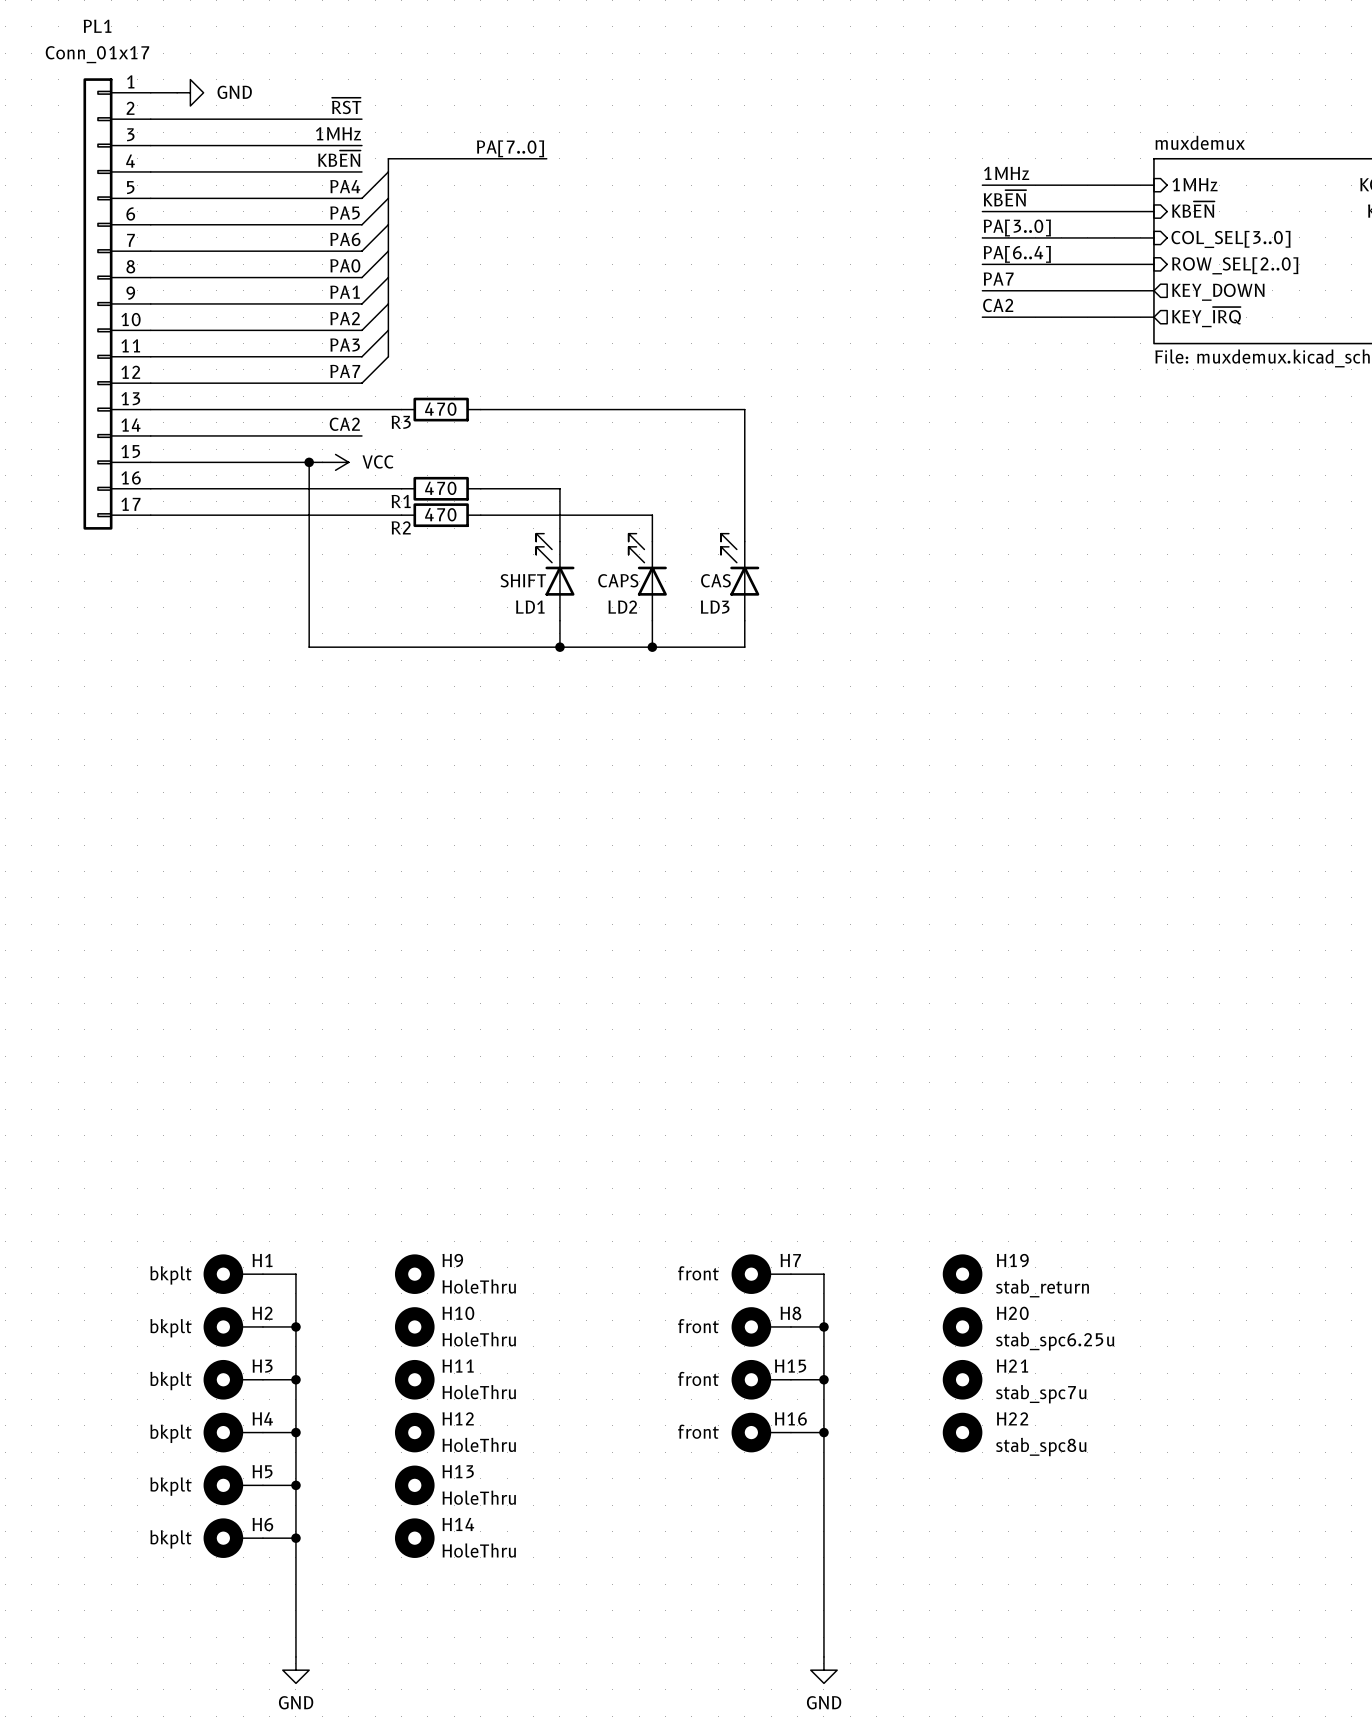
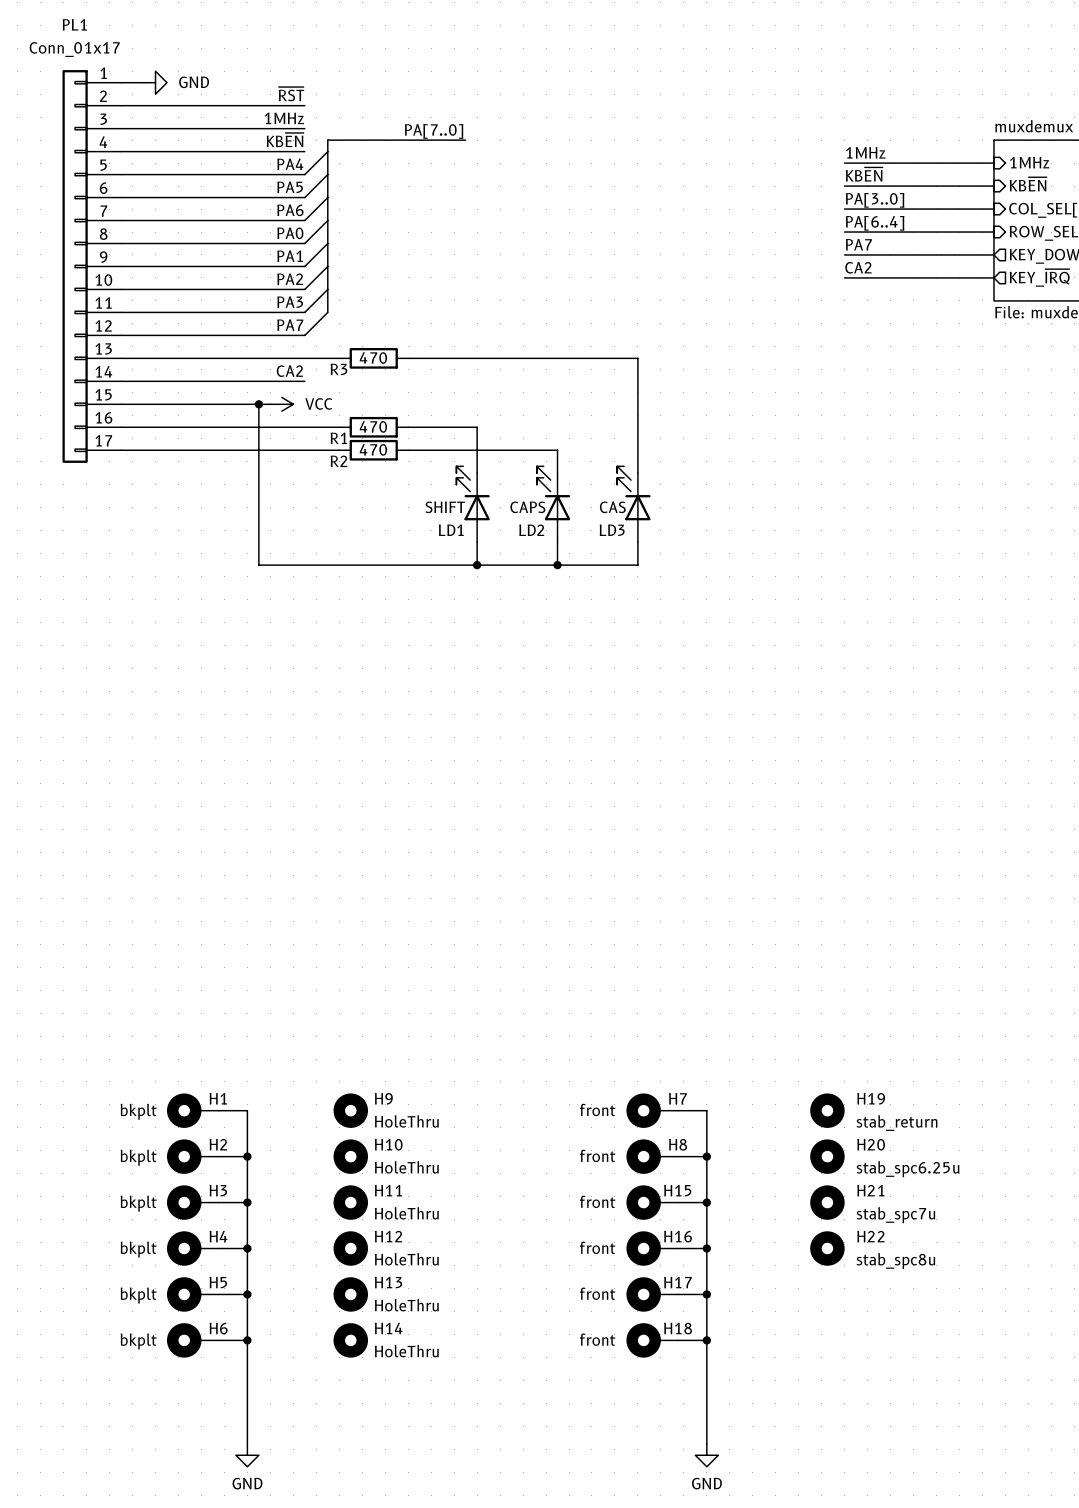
H17: none -> front (652, 1294)
wire: none -> (678, 1294) (706, 1294)
junction: none -> (706, 1294)
H18: none -> front (652, 1340)
wire: none -> (678, 1340) (706, 1340)
junction: none -> (706, 1340)

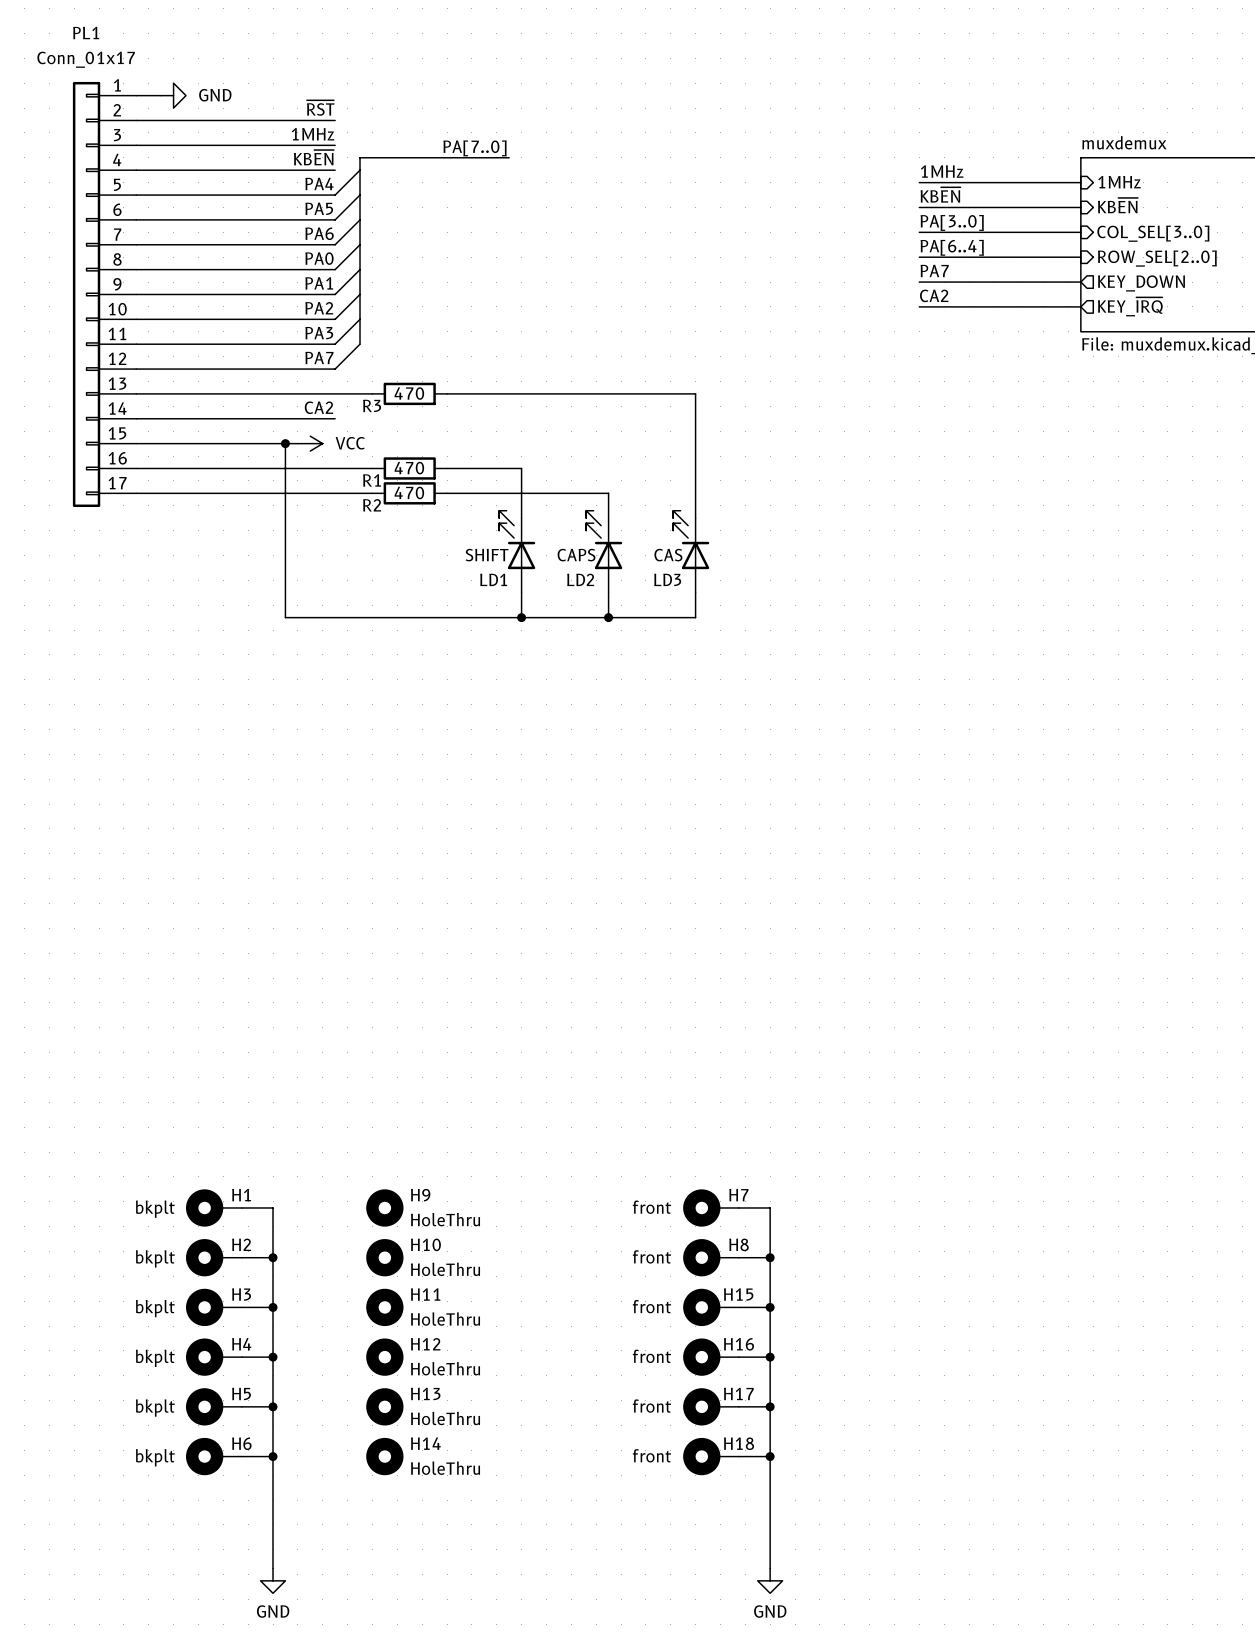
H19: stab_return (827, 1110) -> none
H20: stab_spc6.25u (827, 1156) -> none
H21: stab_spc7u (827, 1202) -> none
H22: stab_spc8u (827, 1248) -> none

